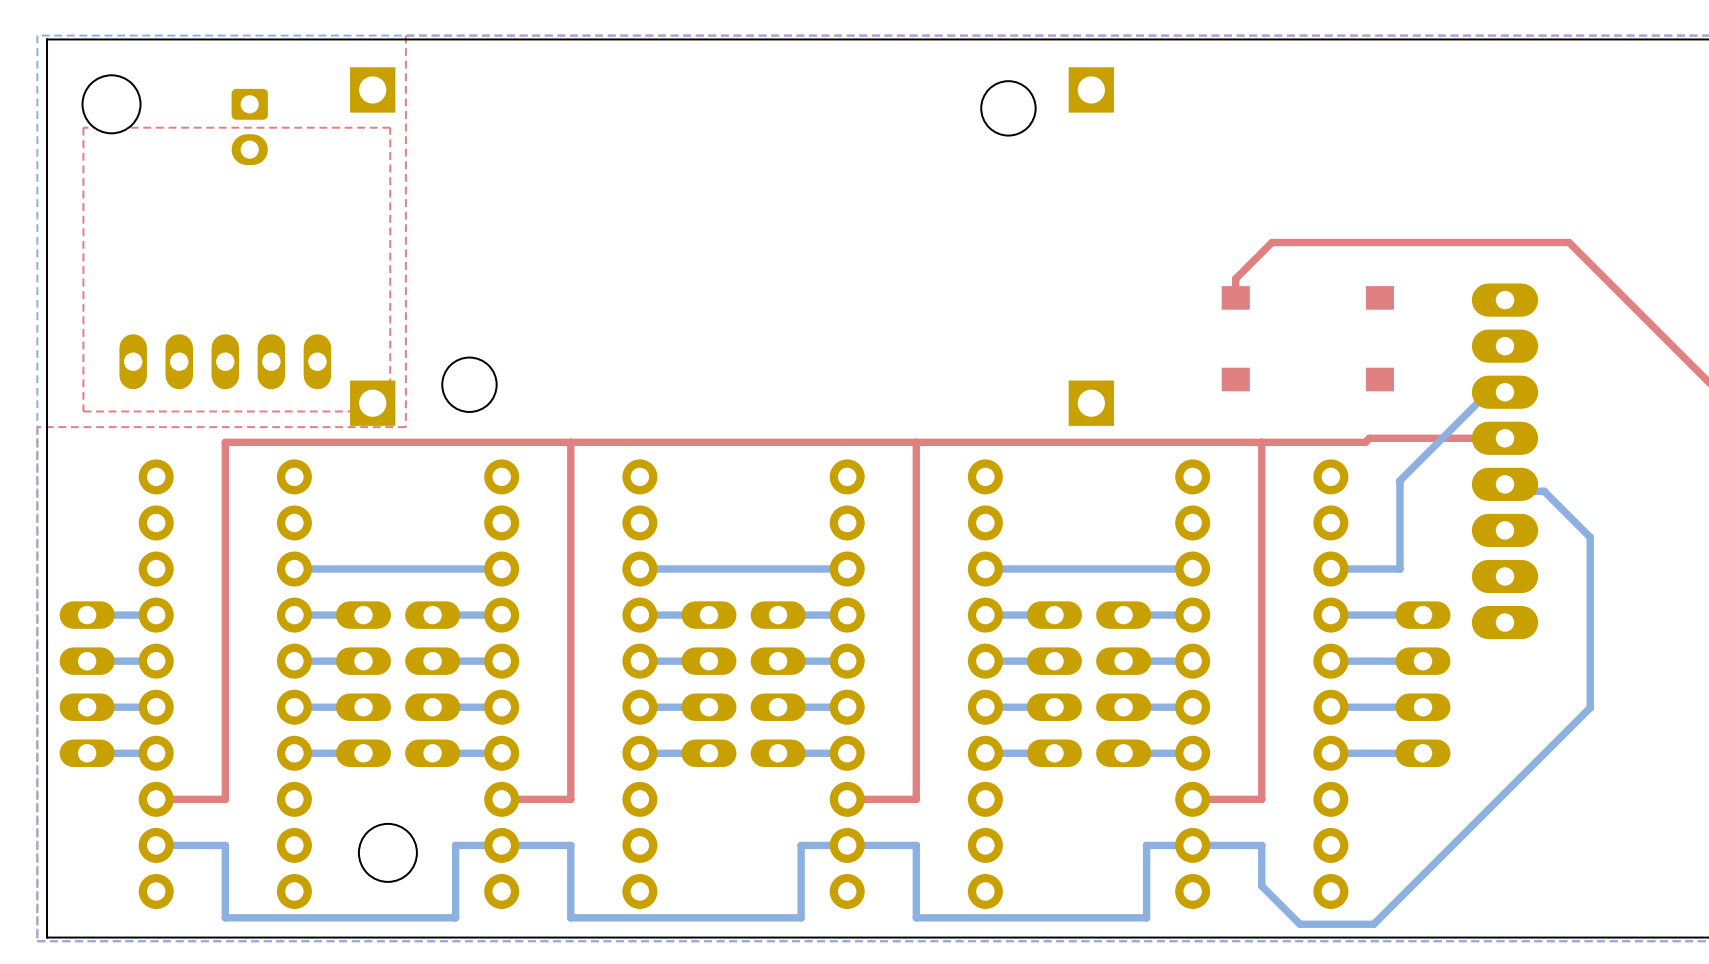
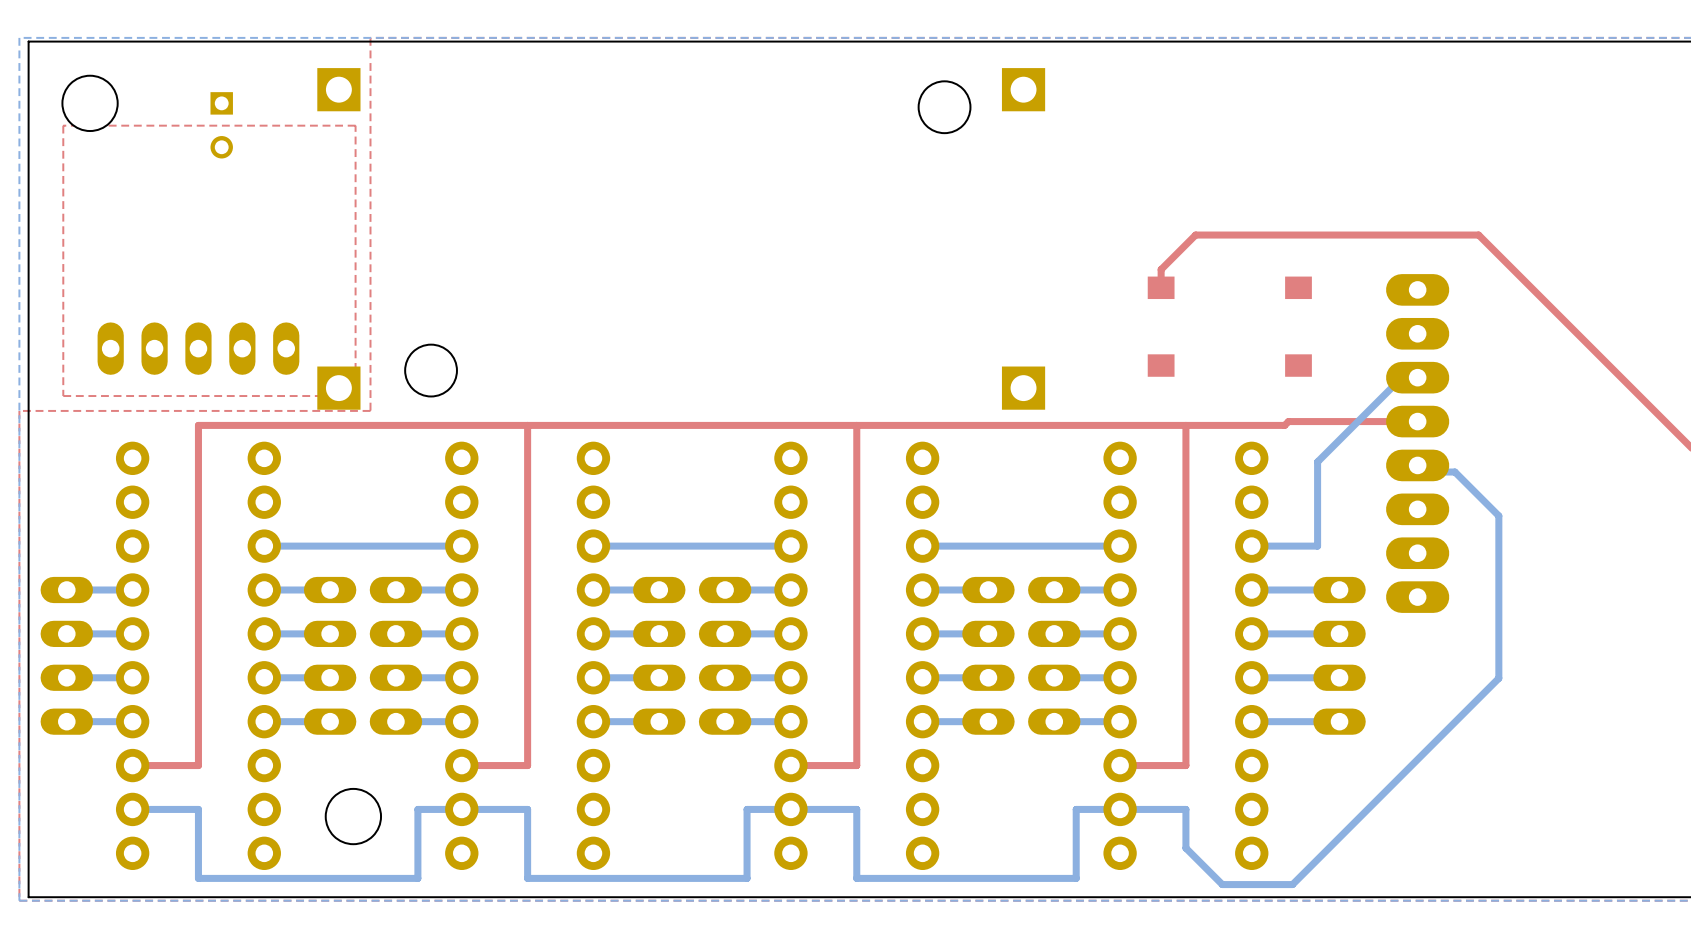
part footprint: [231, 88, 268, 166] -> [210, 92, 233, 159]

